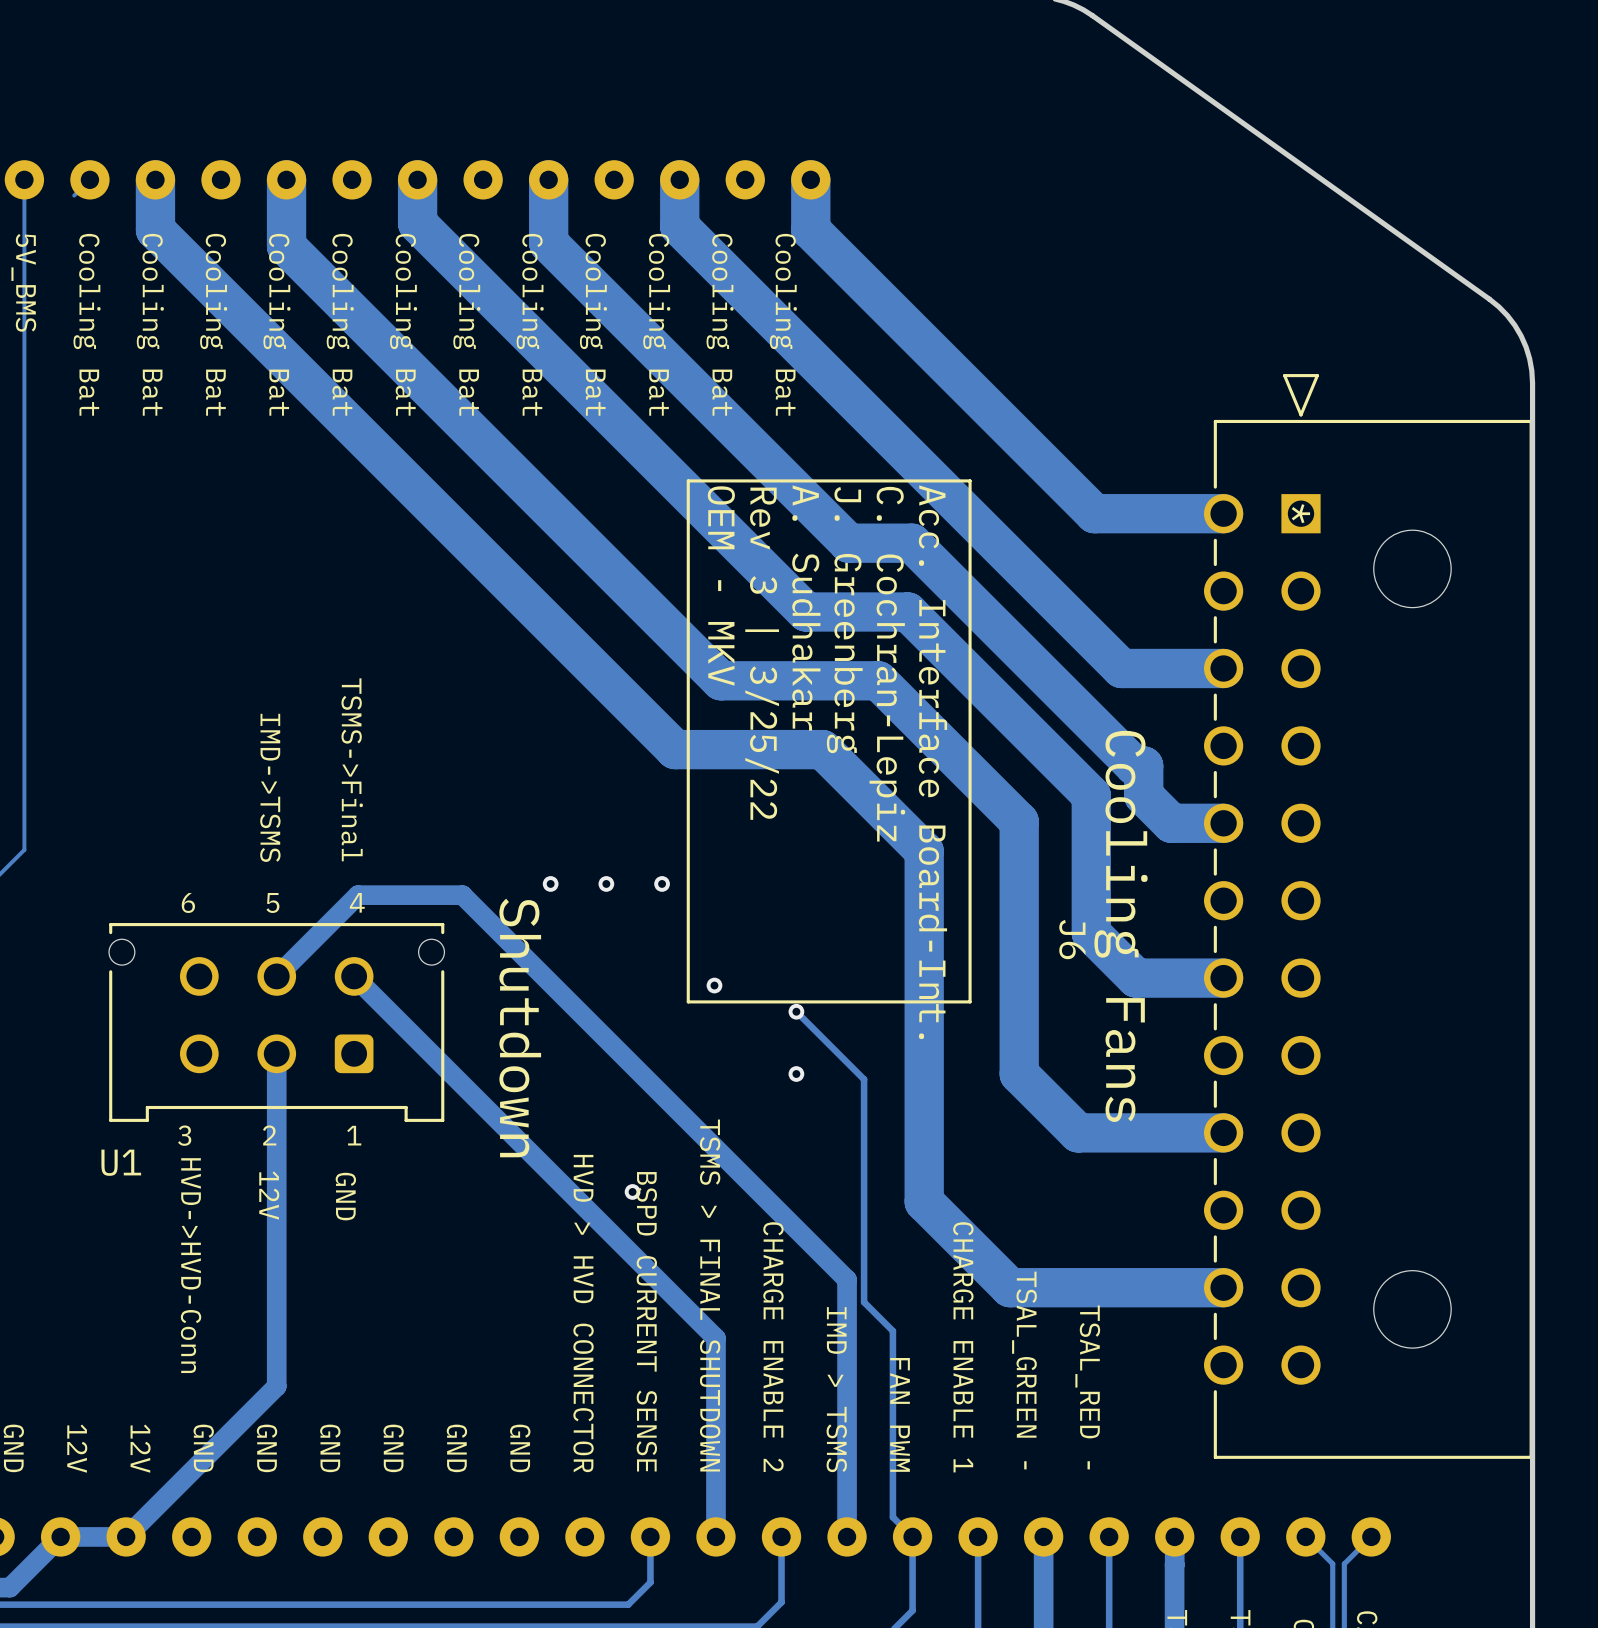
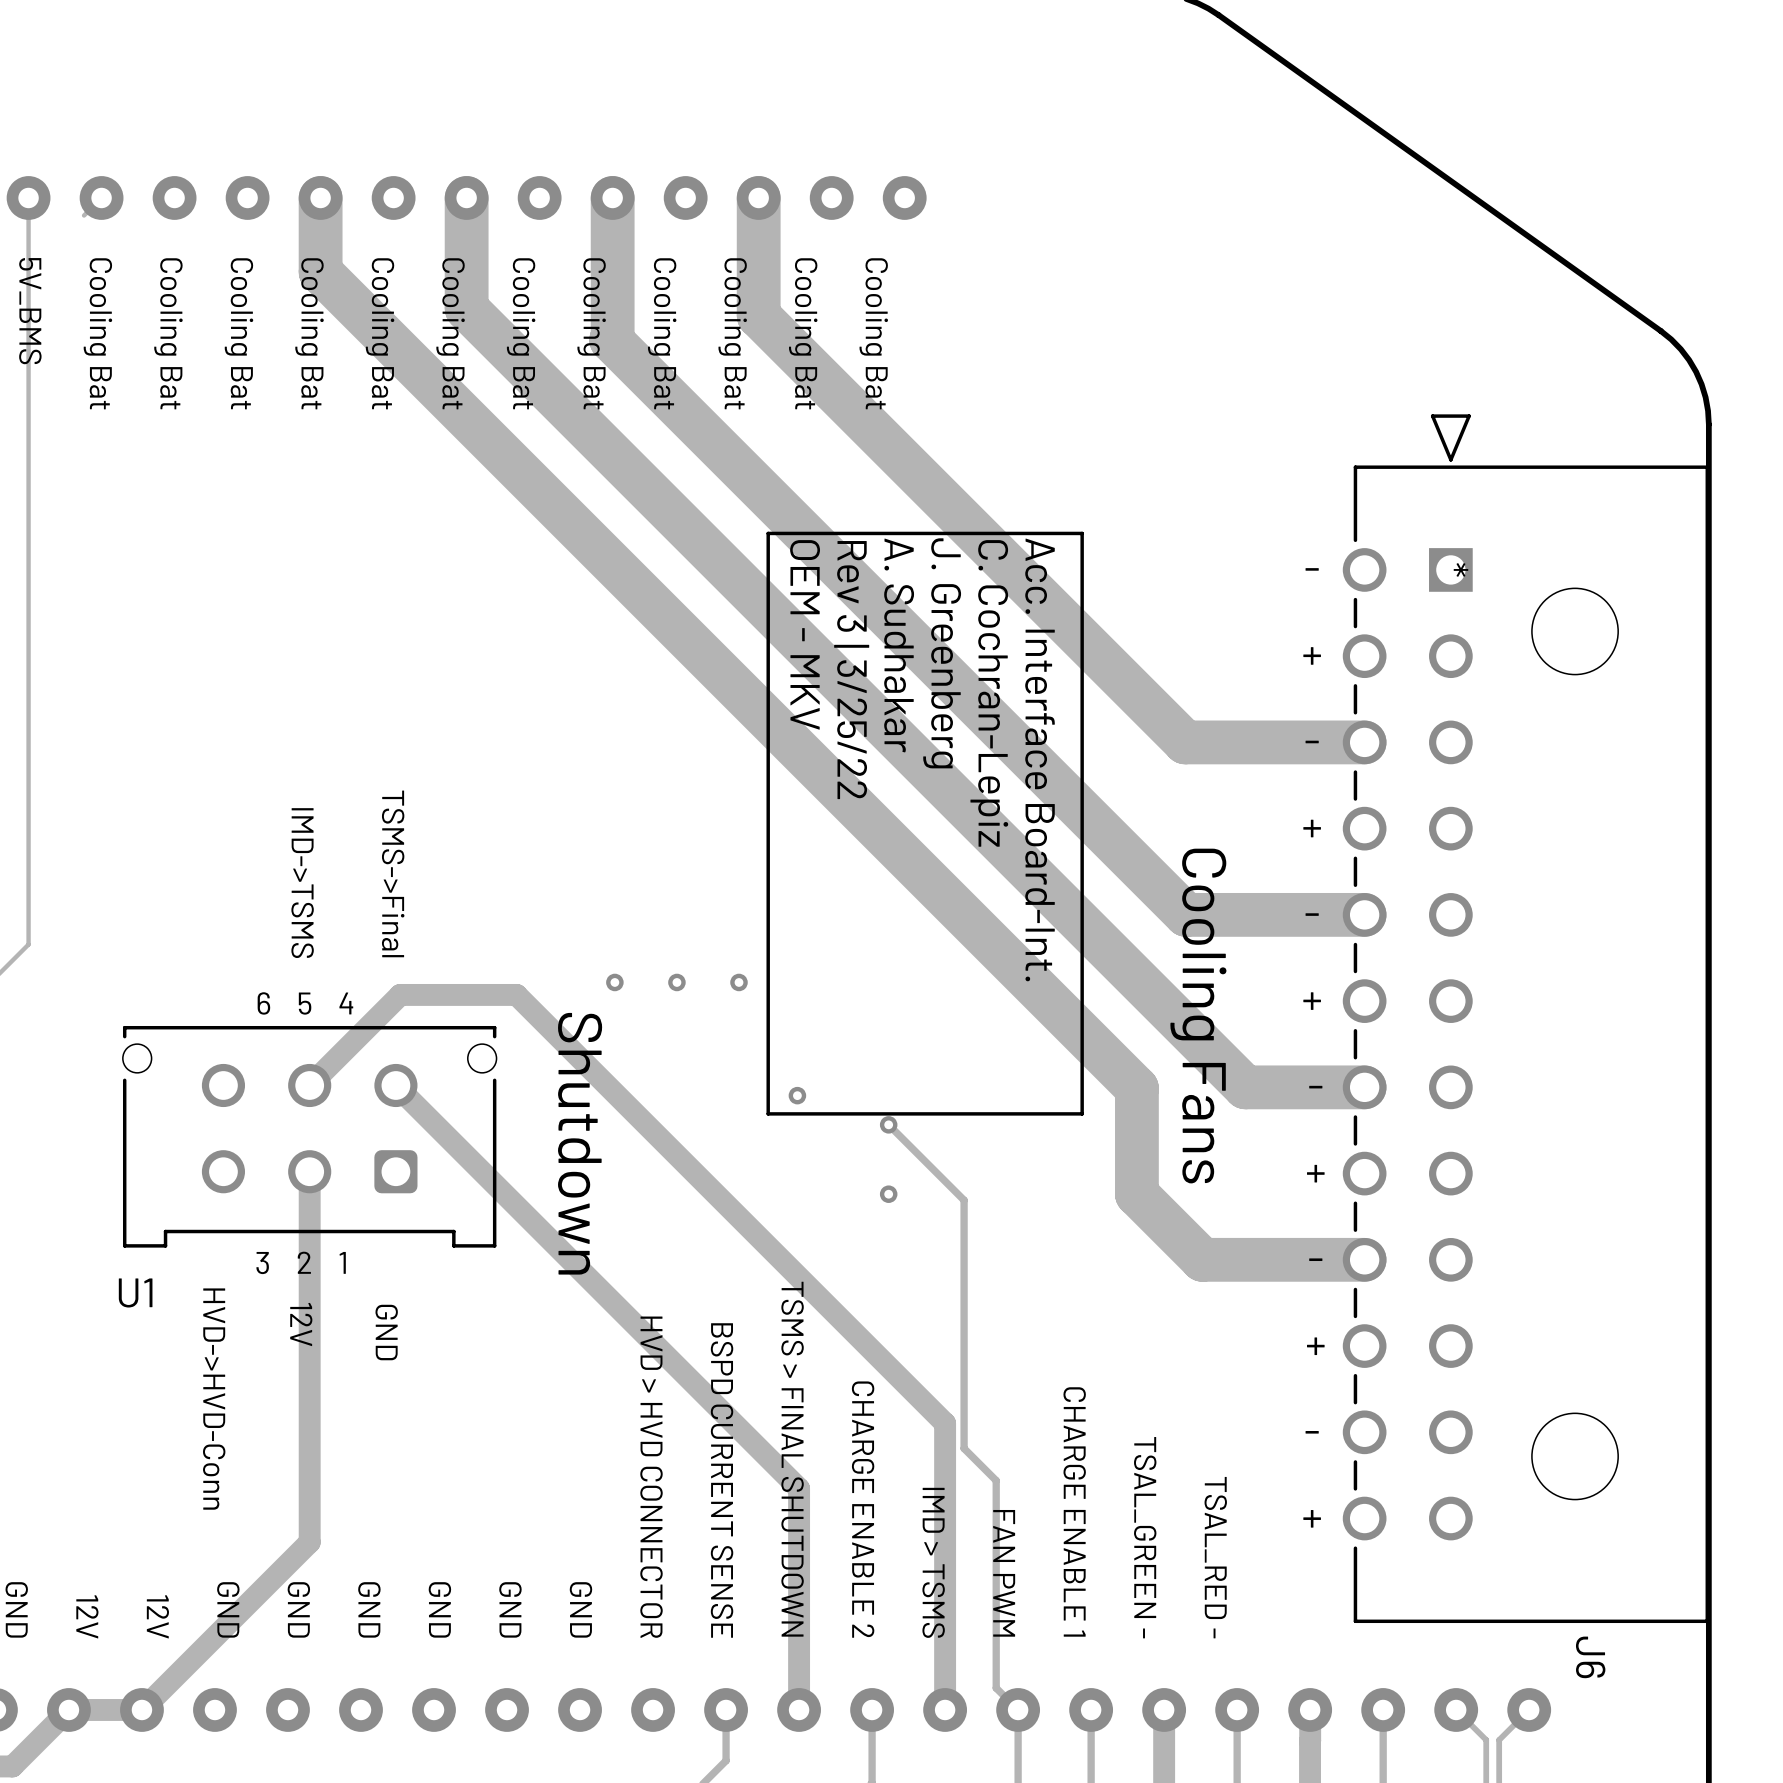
track: (155, 179) (155, 229) (675, 749) (822, 749) (924, 851) (924, 1201) (1010, 1287) (1223, 1287) -> none
track: (810, 179) (810, 229) (1094, 513) (1223, 513) -> none
track: (417, 223) (806, 612) (907, 612) (1091, 795) (1091, 933) (1136, 978) -> (466, 246) (466, 308) (1245, 1087) (1267, 1087)
track: (679, 226) (1121, 668) -> (758, 250) (758, 315) (1185, 742) (1250, 742)
track: (548, 243) (848, 543) (912, 543) (1134, 766) (1143, 766) (1143, 795) (1171, 823) -> (612, 268) (611, 339) (1186, 914) (1306, 914)
text: none -> - (1312, 569)
text: none -> + (1312, 655)
text: none -> - (1312, 741)
track: (721, 680) (878, 680) (1019, 821) (1019, 978) -> (804, 756) (1136, 1088)
text: none -> + (1312, 828)
text: none -> - (1312, 914)
text: none -> + (1312, 1001)
text position: Cooling Fans (1121, 926) -> Cooling Fans (1198, 1016)
J6 name position: J6 (1072, 939) -> J6 (1590, 1657)
text: none -> - (1315, 1087)
text: none -> + (1315, 1173)
text: none -> - (1315, 1259)
via: (632, 1191) -> none
text: none -> + (1315, 1346)
text: none -> - (1312, 1432)
text: none -> + (1312, 1518)

